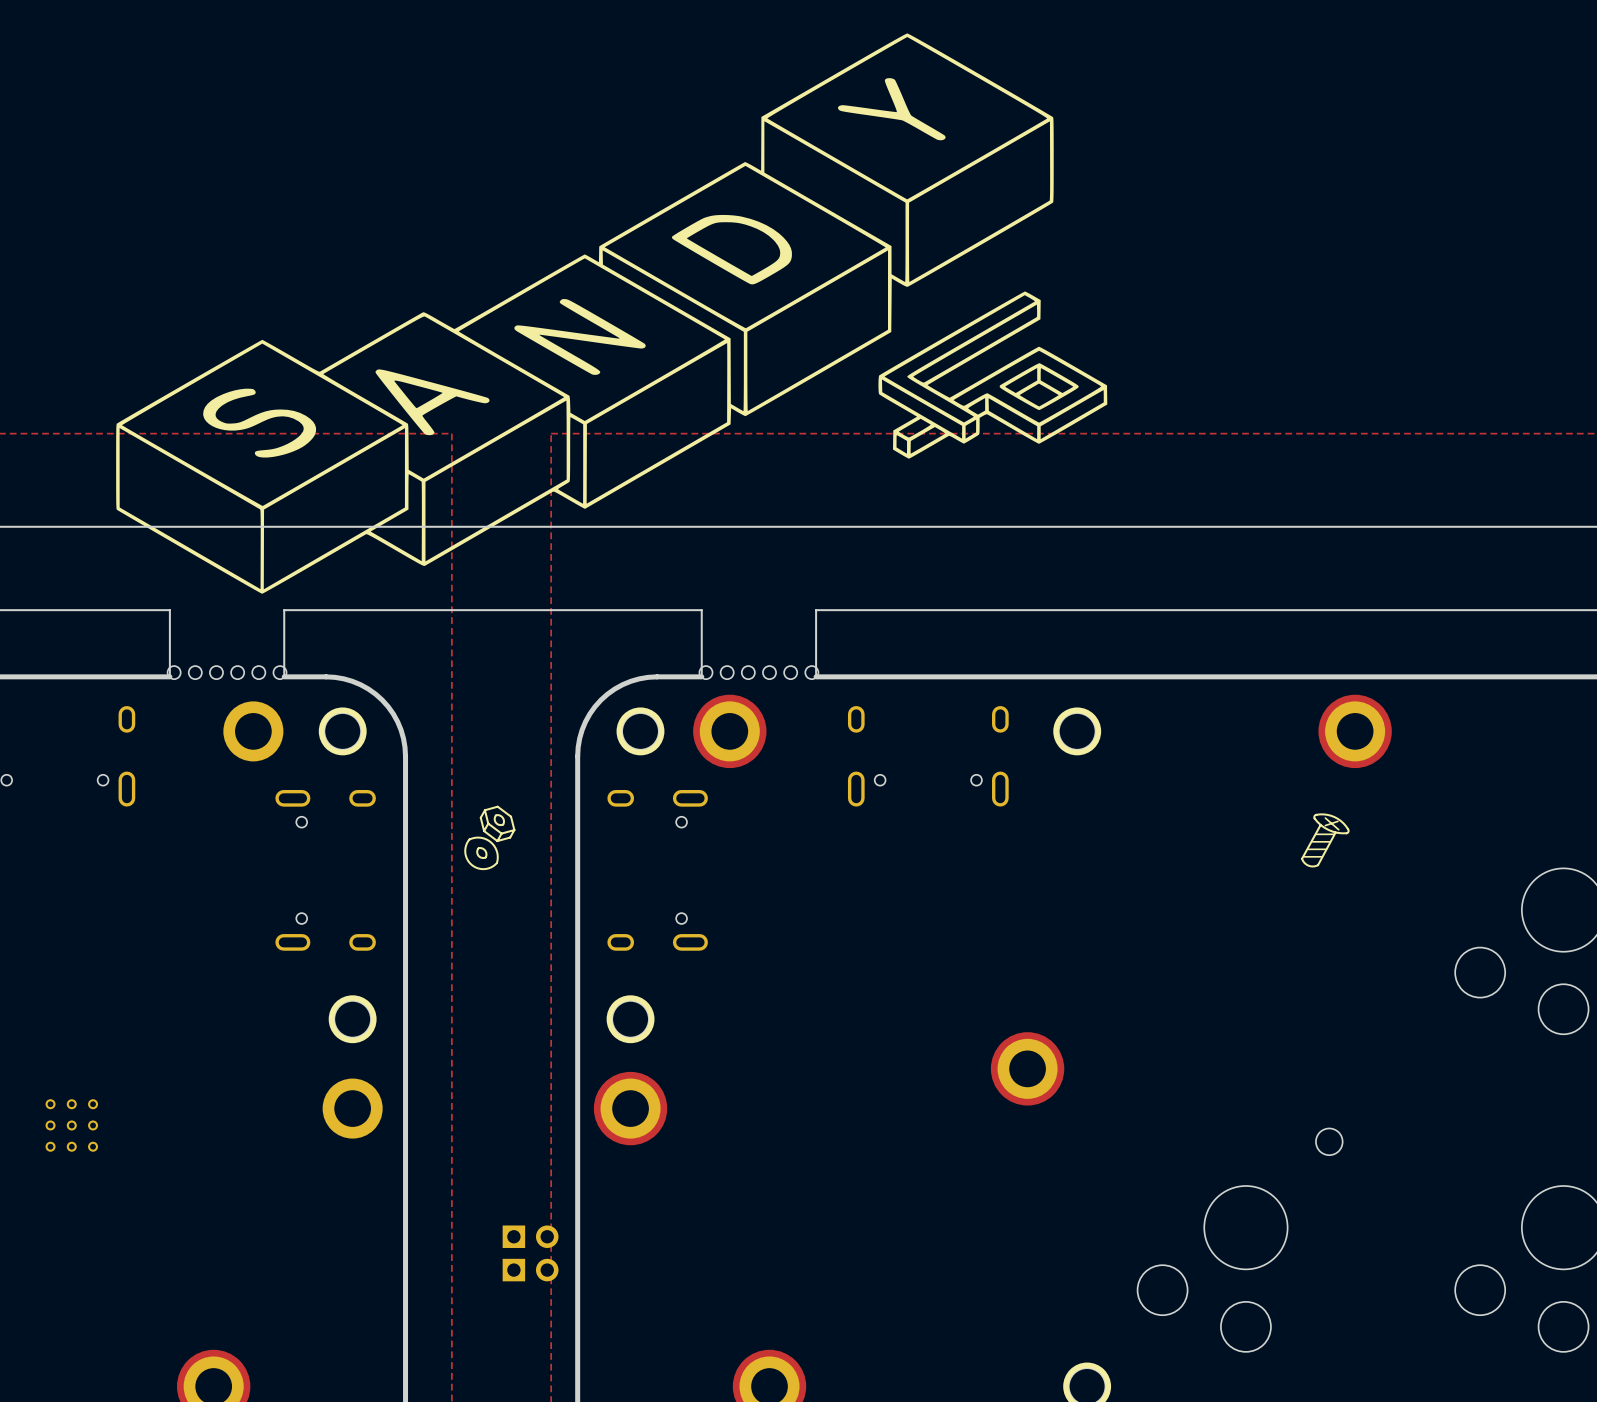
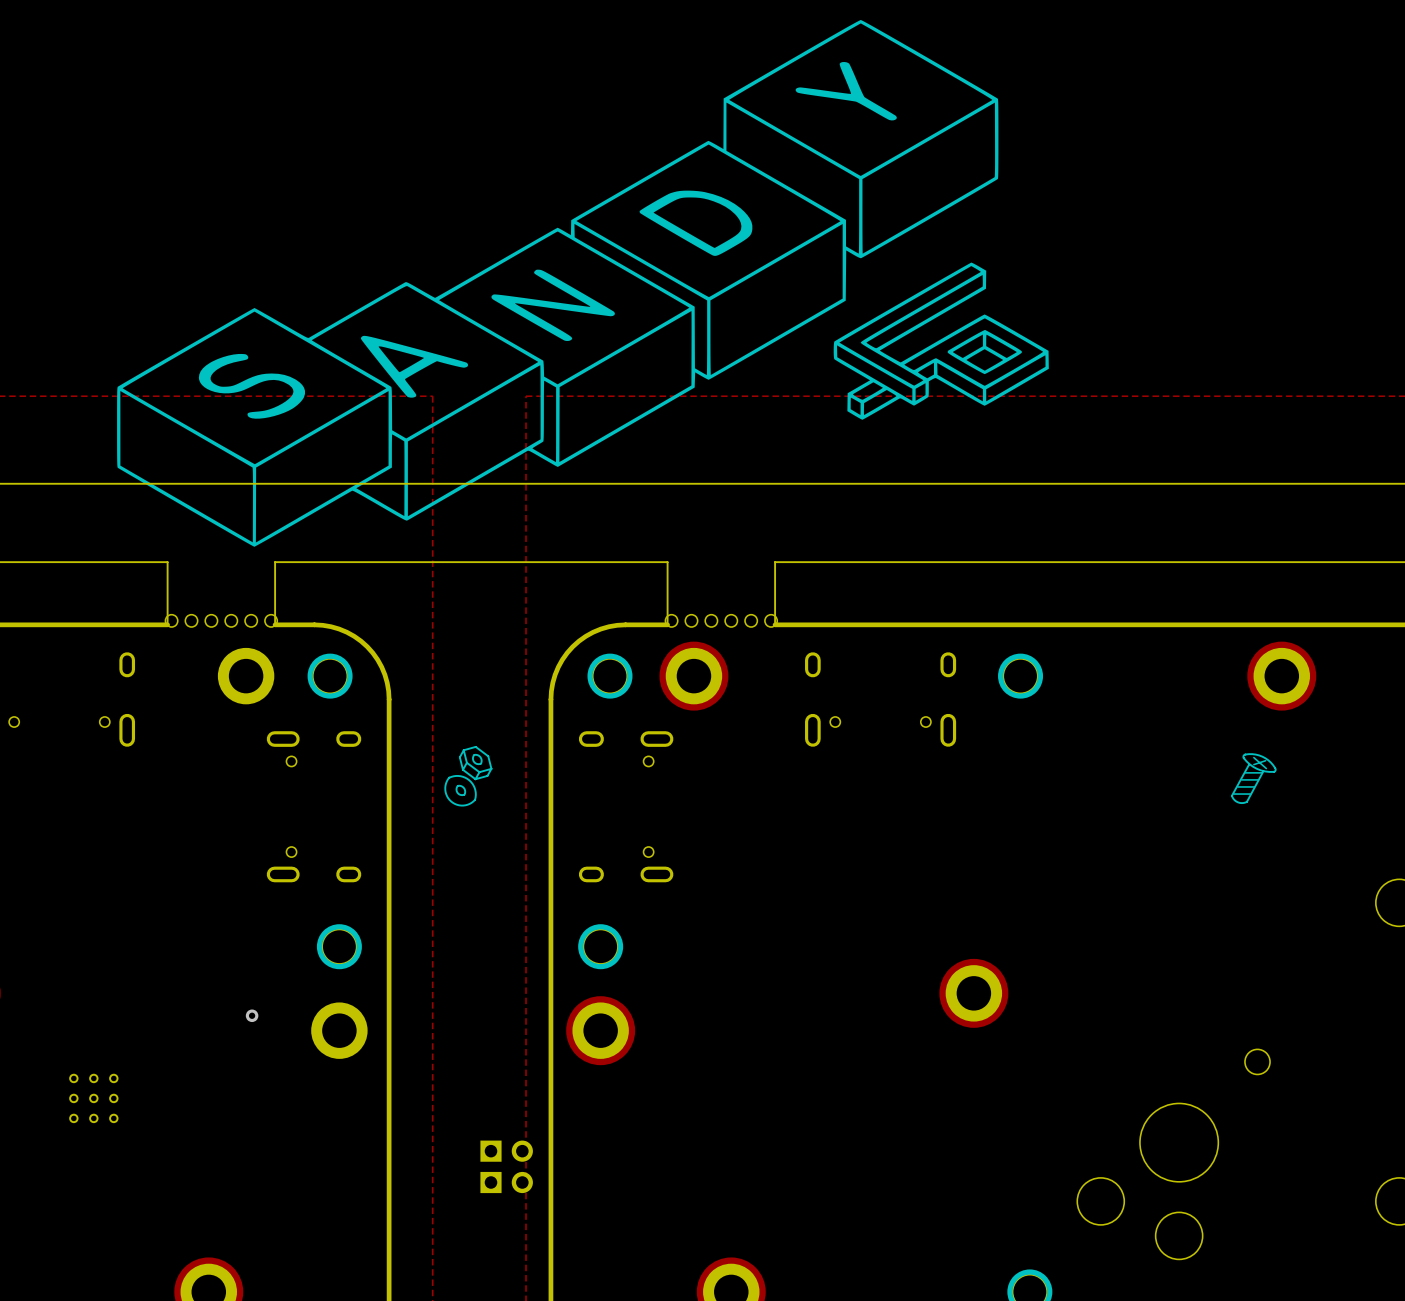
via: none -> (252, 1015)
part position: (71, 1125) -> (93, 1098)

